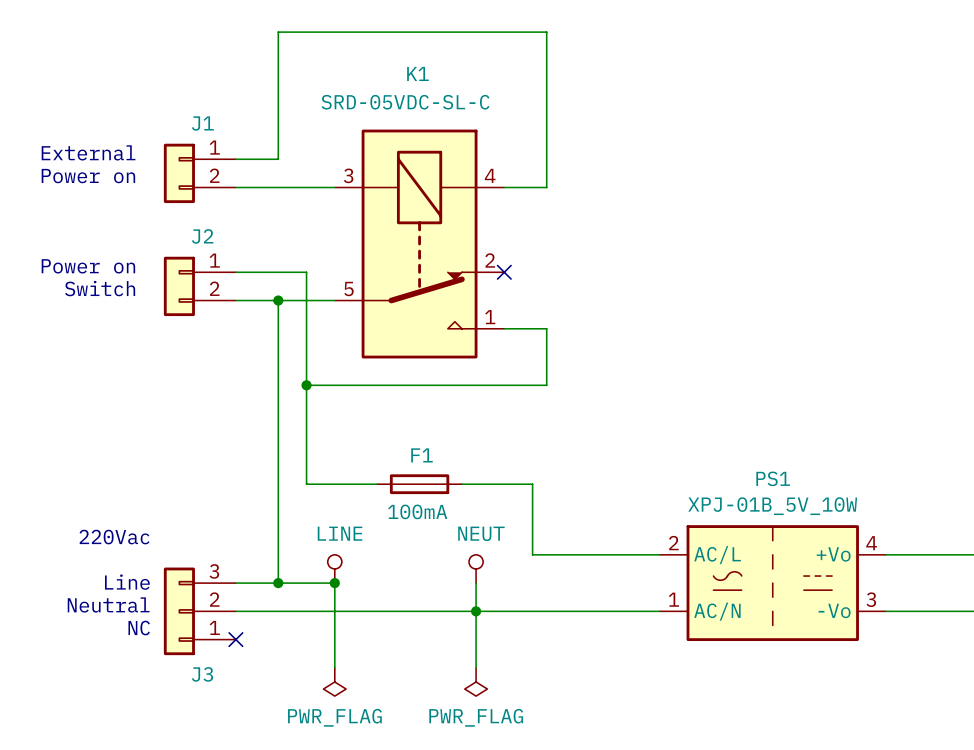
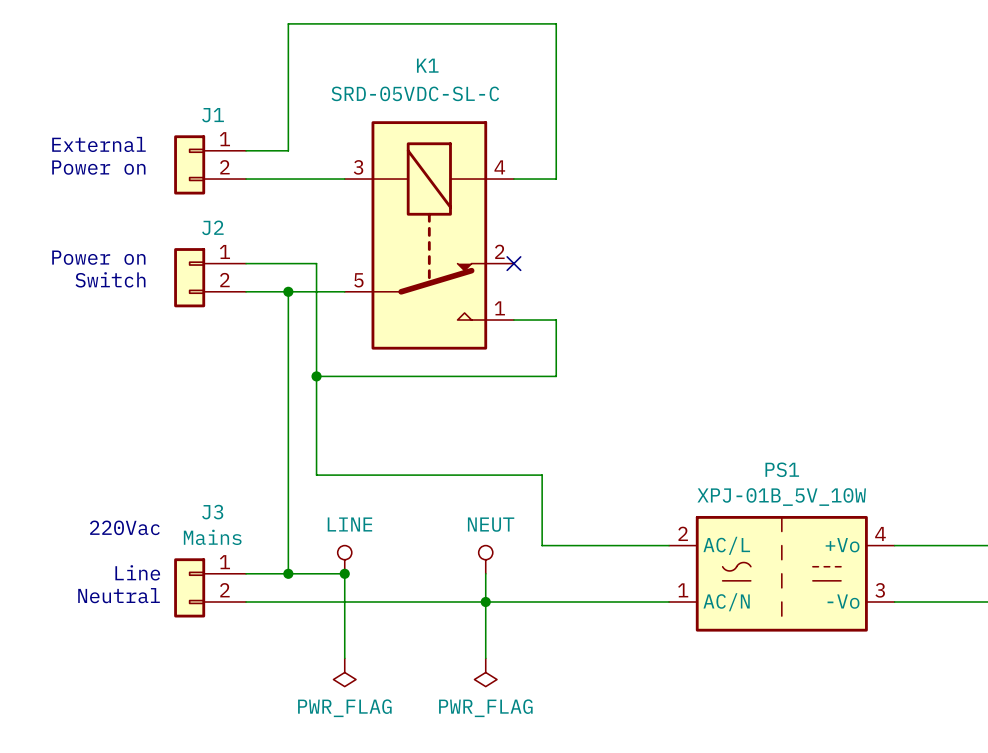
F1: 100mA (419, 484) -> none
J3 value: none -> Mains (212, 537)
J3 symbol: [163, 567, 236, 656] -> [174, 558, 247, 618]
text: NC (139, 628) -> none
no-connect mark: (235, 639) -> none
J3 name position: J3 (202, 674) -> J3 (212, 512)

